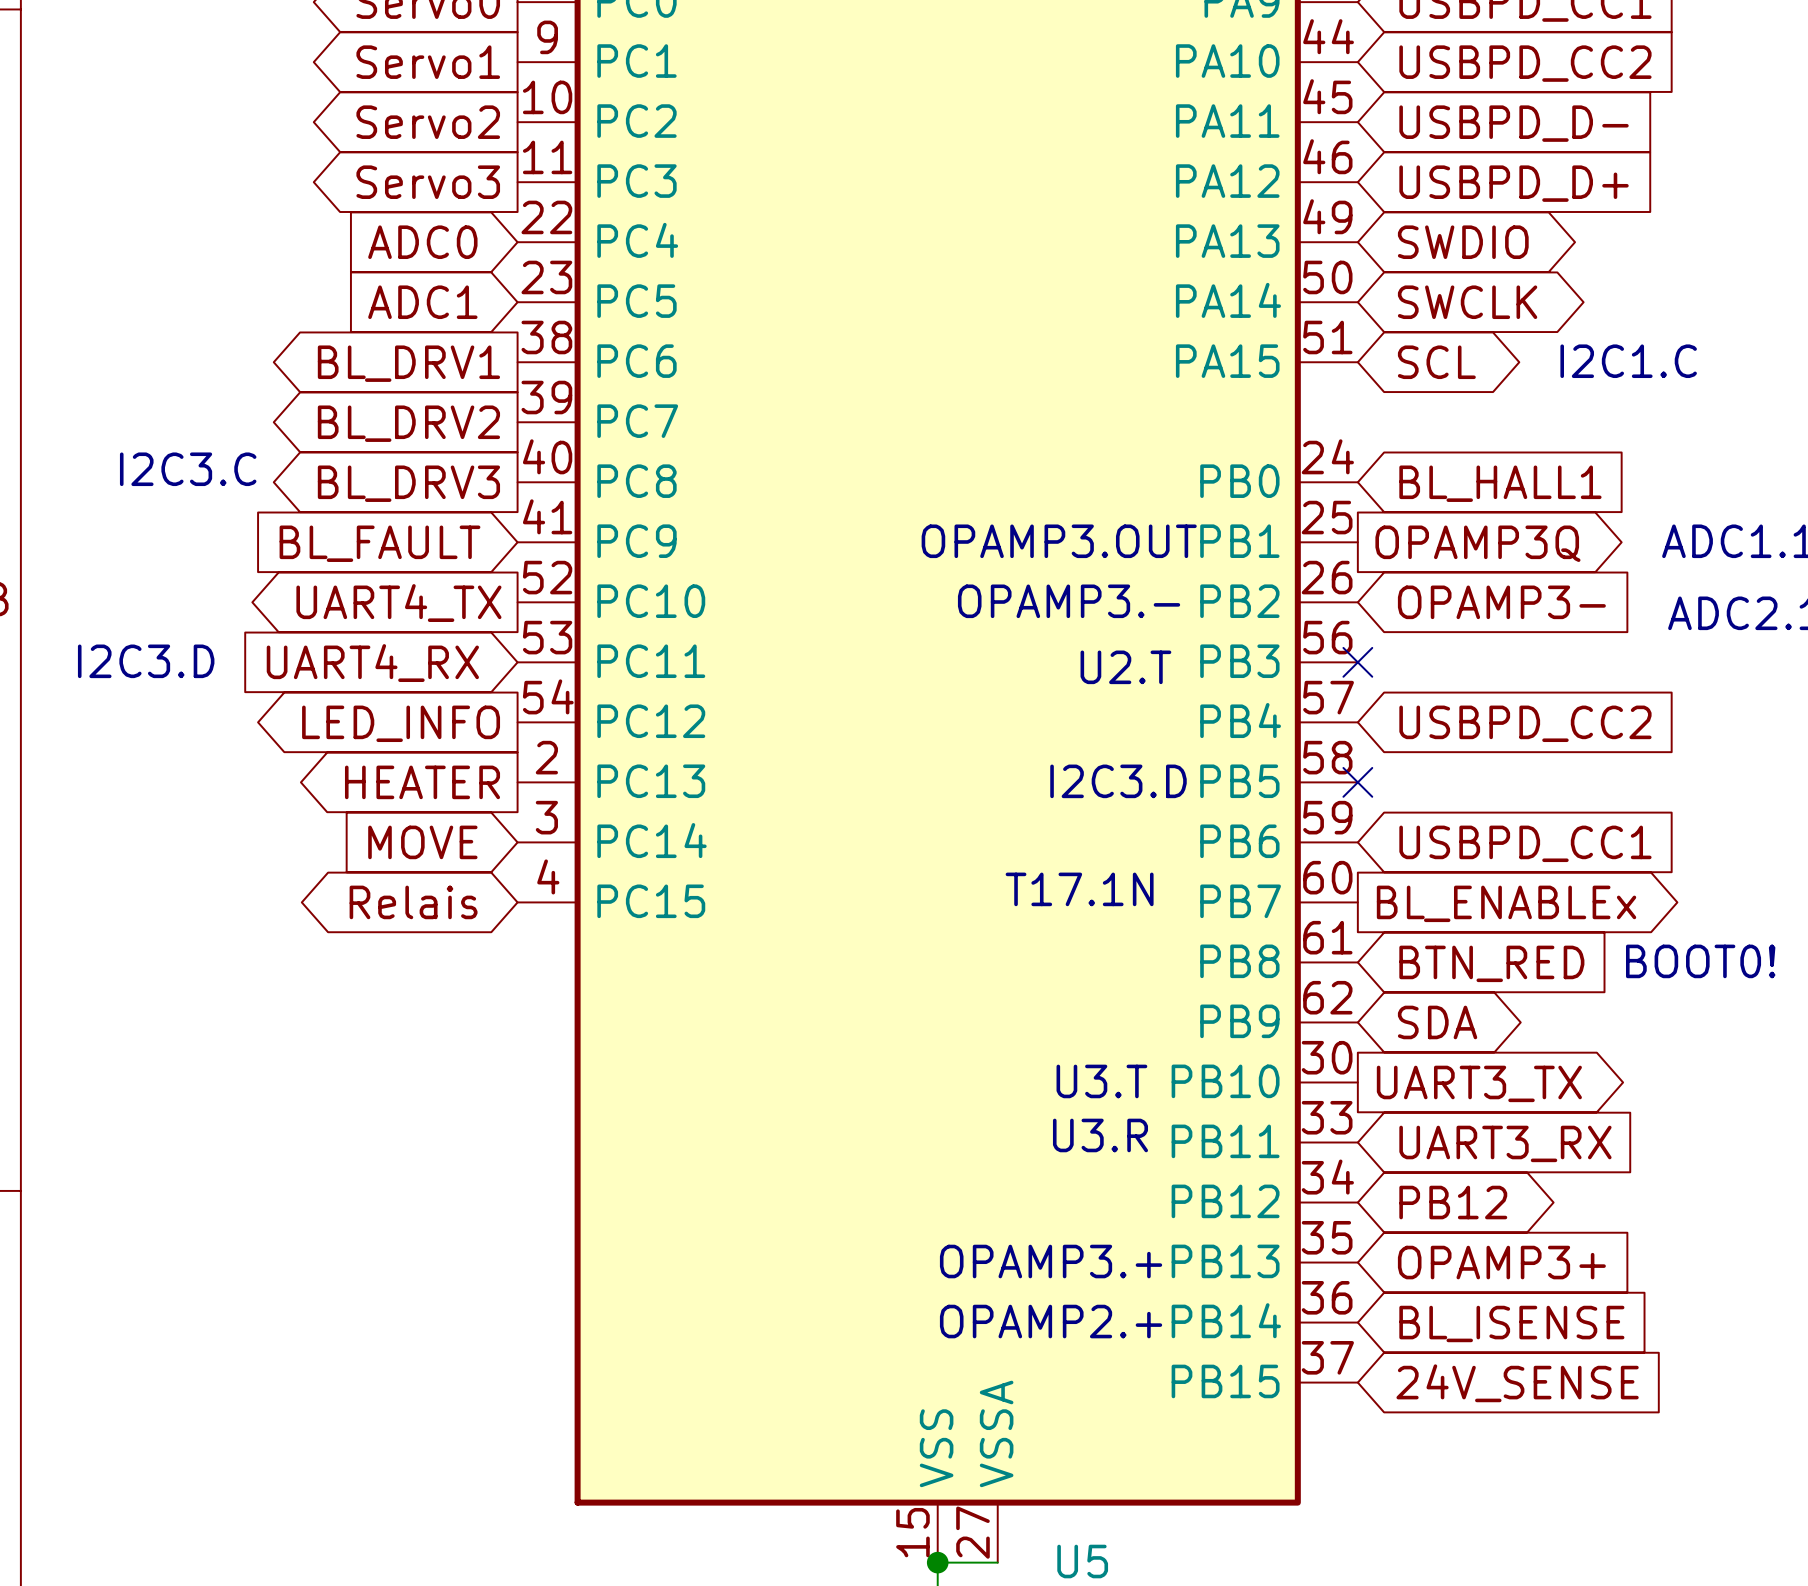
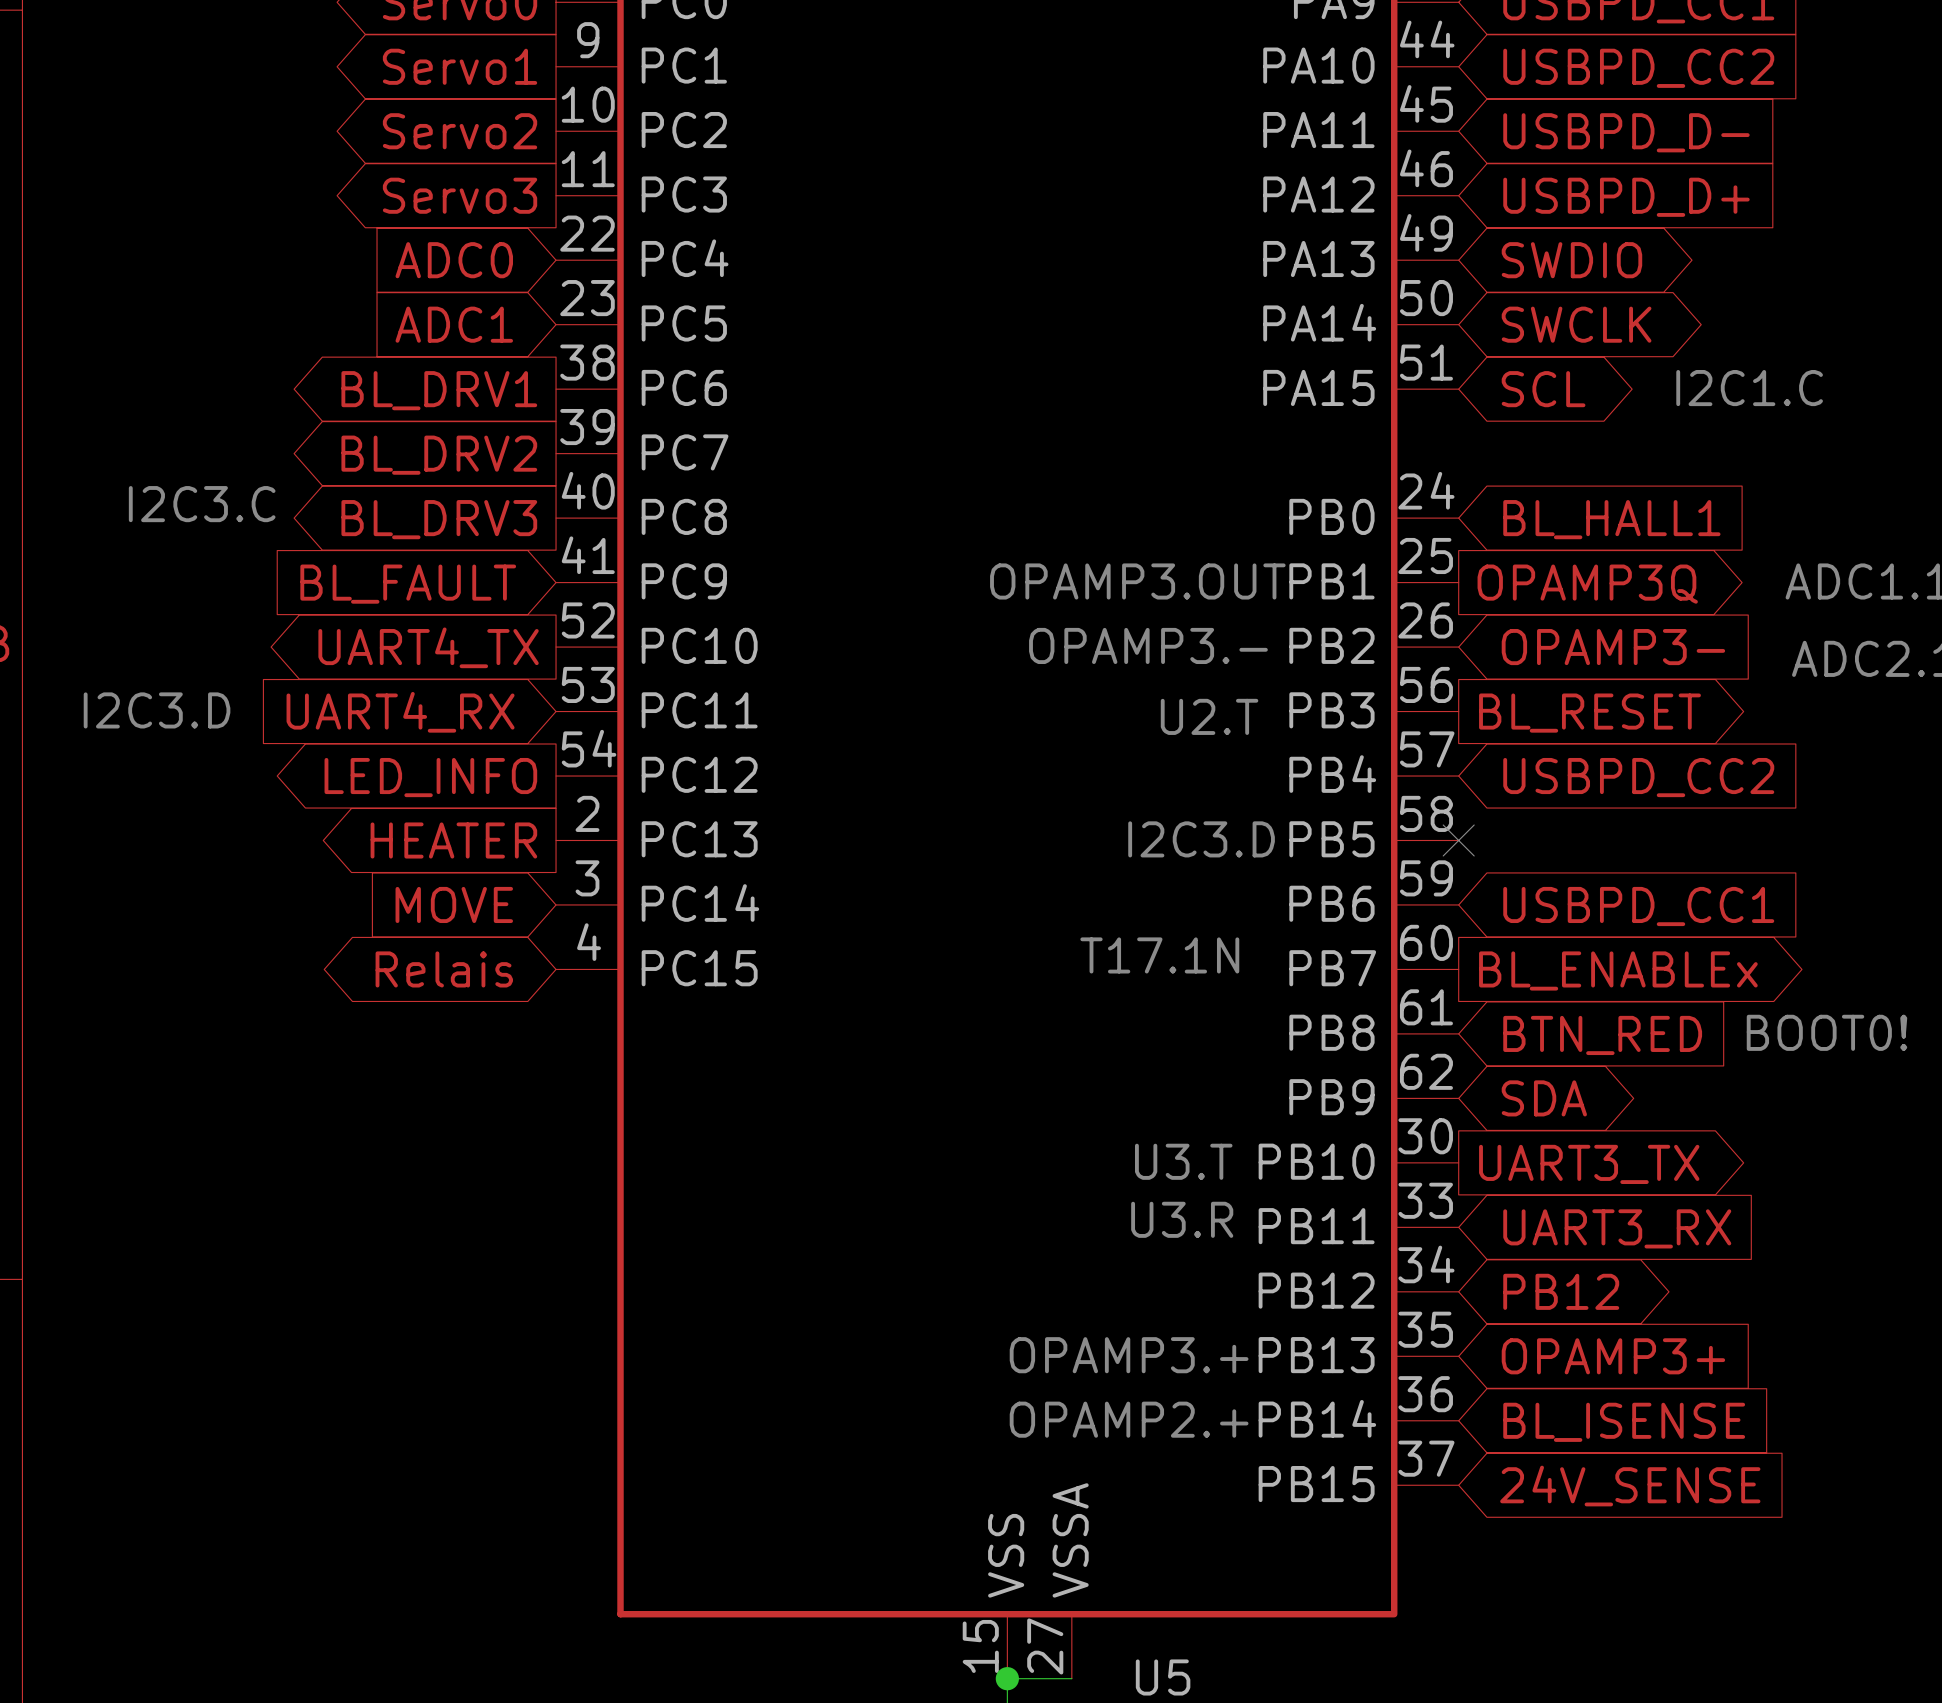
no-connect mark: (1357, 662) -> none
global label: none -> BL_RESET (1590, 713)

